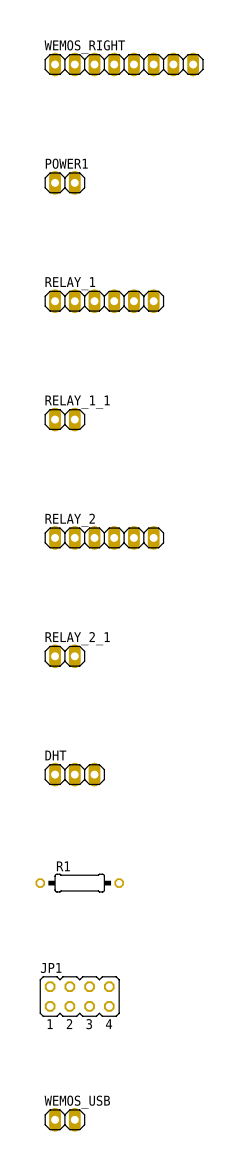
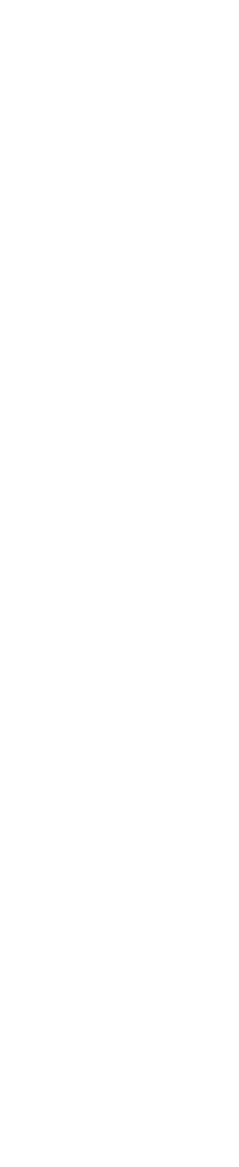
WEMOS_RIGHT: (124, 64) -> none
POWER1: (64, 182) -> none
RELAY_1: (104, 301) -> none
RELAY_1_1: (64, 419) -> none
RELAY_2: (104, 537) -> none
RELAY_2_1: (64, 656) -> none
DHT: (74, 774) -> none
R1: (79, 883) -> none
JP1: (79, 996) -> none
WEMOS_USB: (64, 1119) -> none

